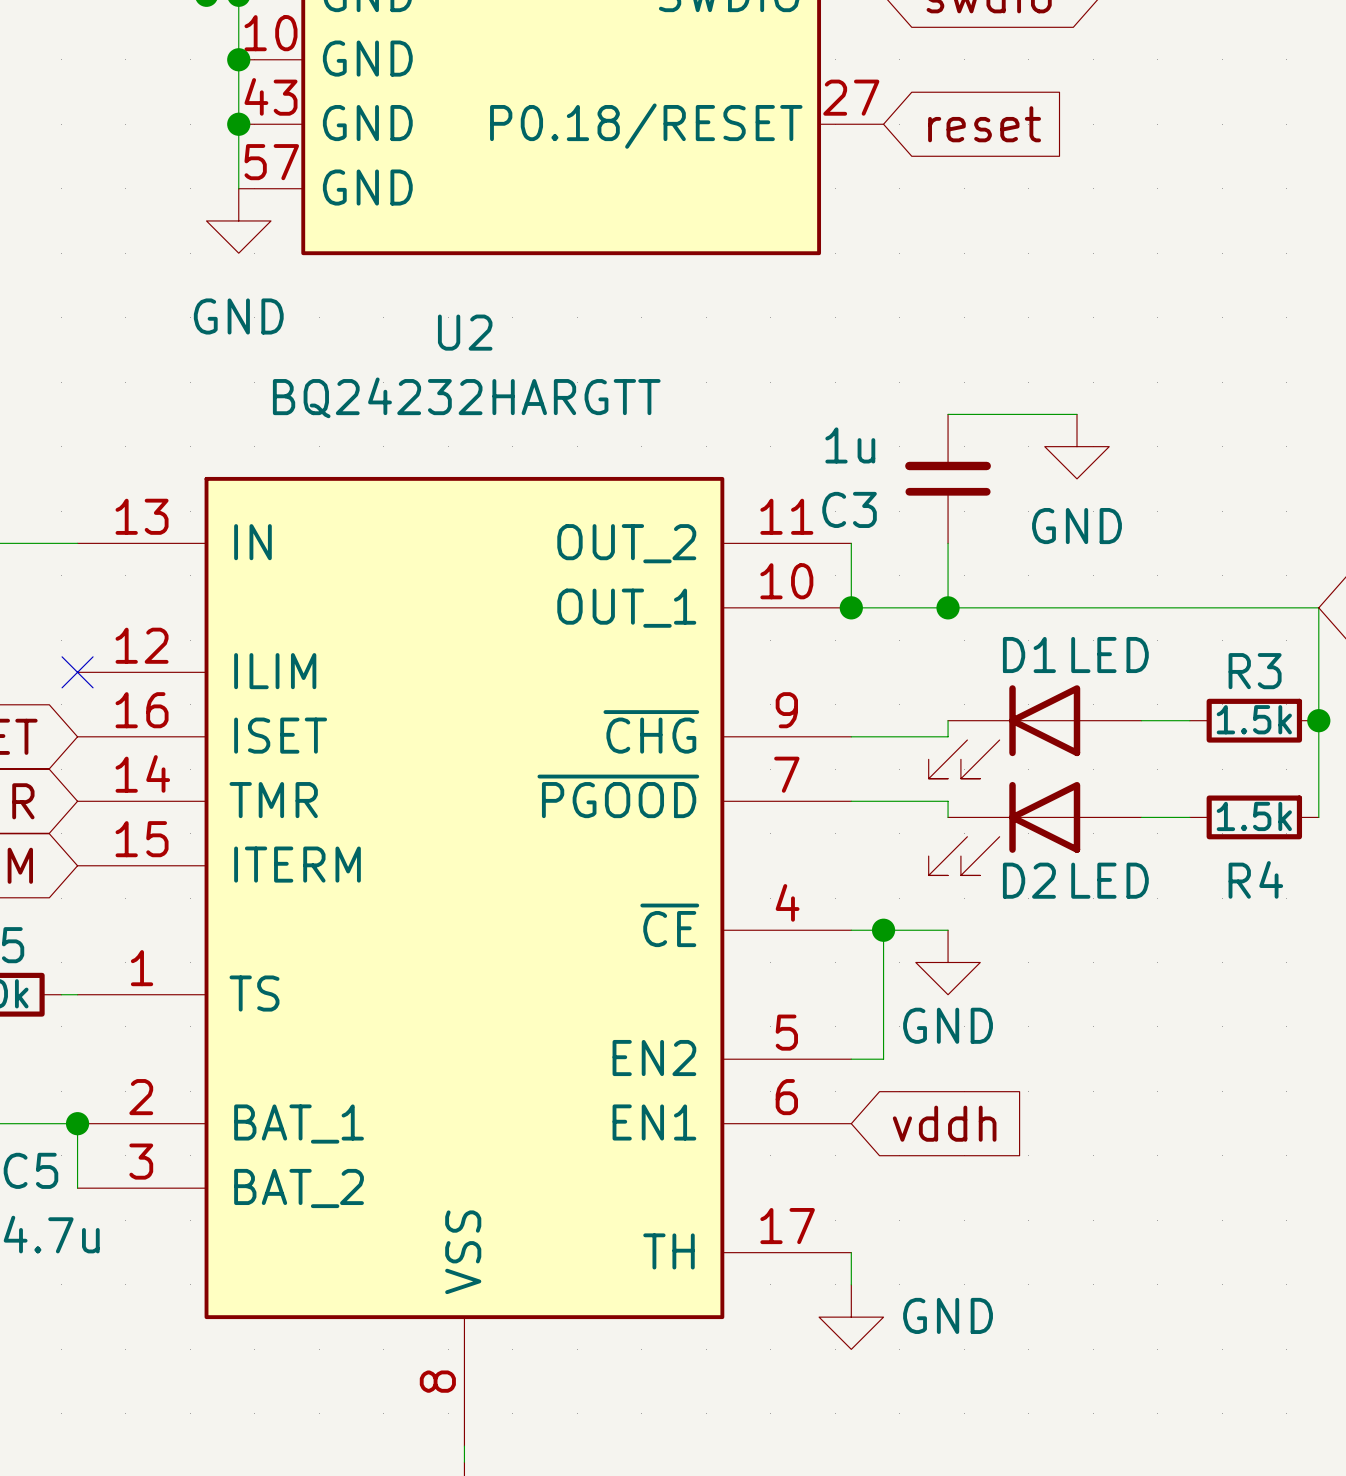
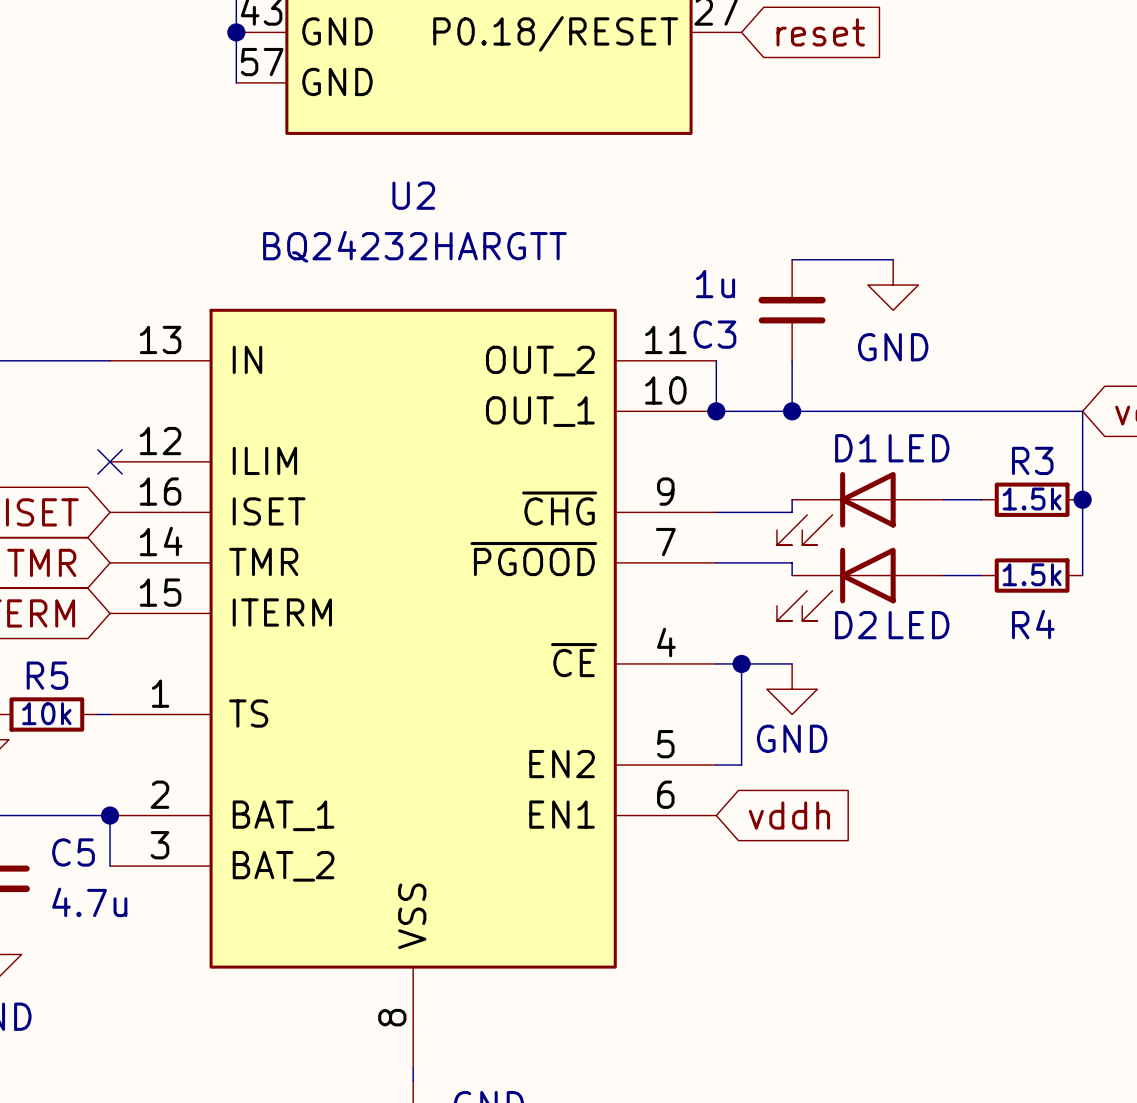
power symbol: GND (238, 220) -> none
U2 symbol: [77, 476, 852, 1447] -> [110, 308, 717, 1069]
wire: (851, 1252) (851, 1284) -> none
power symbol: GND (851, 1317) -> none

